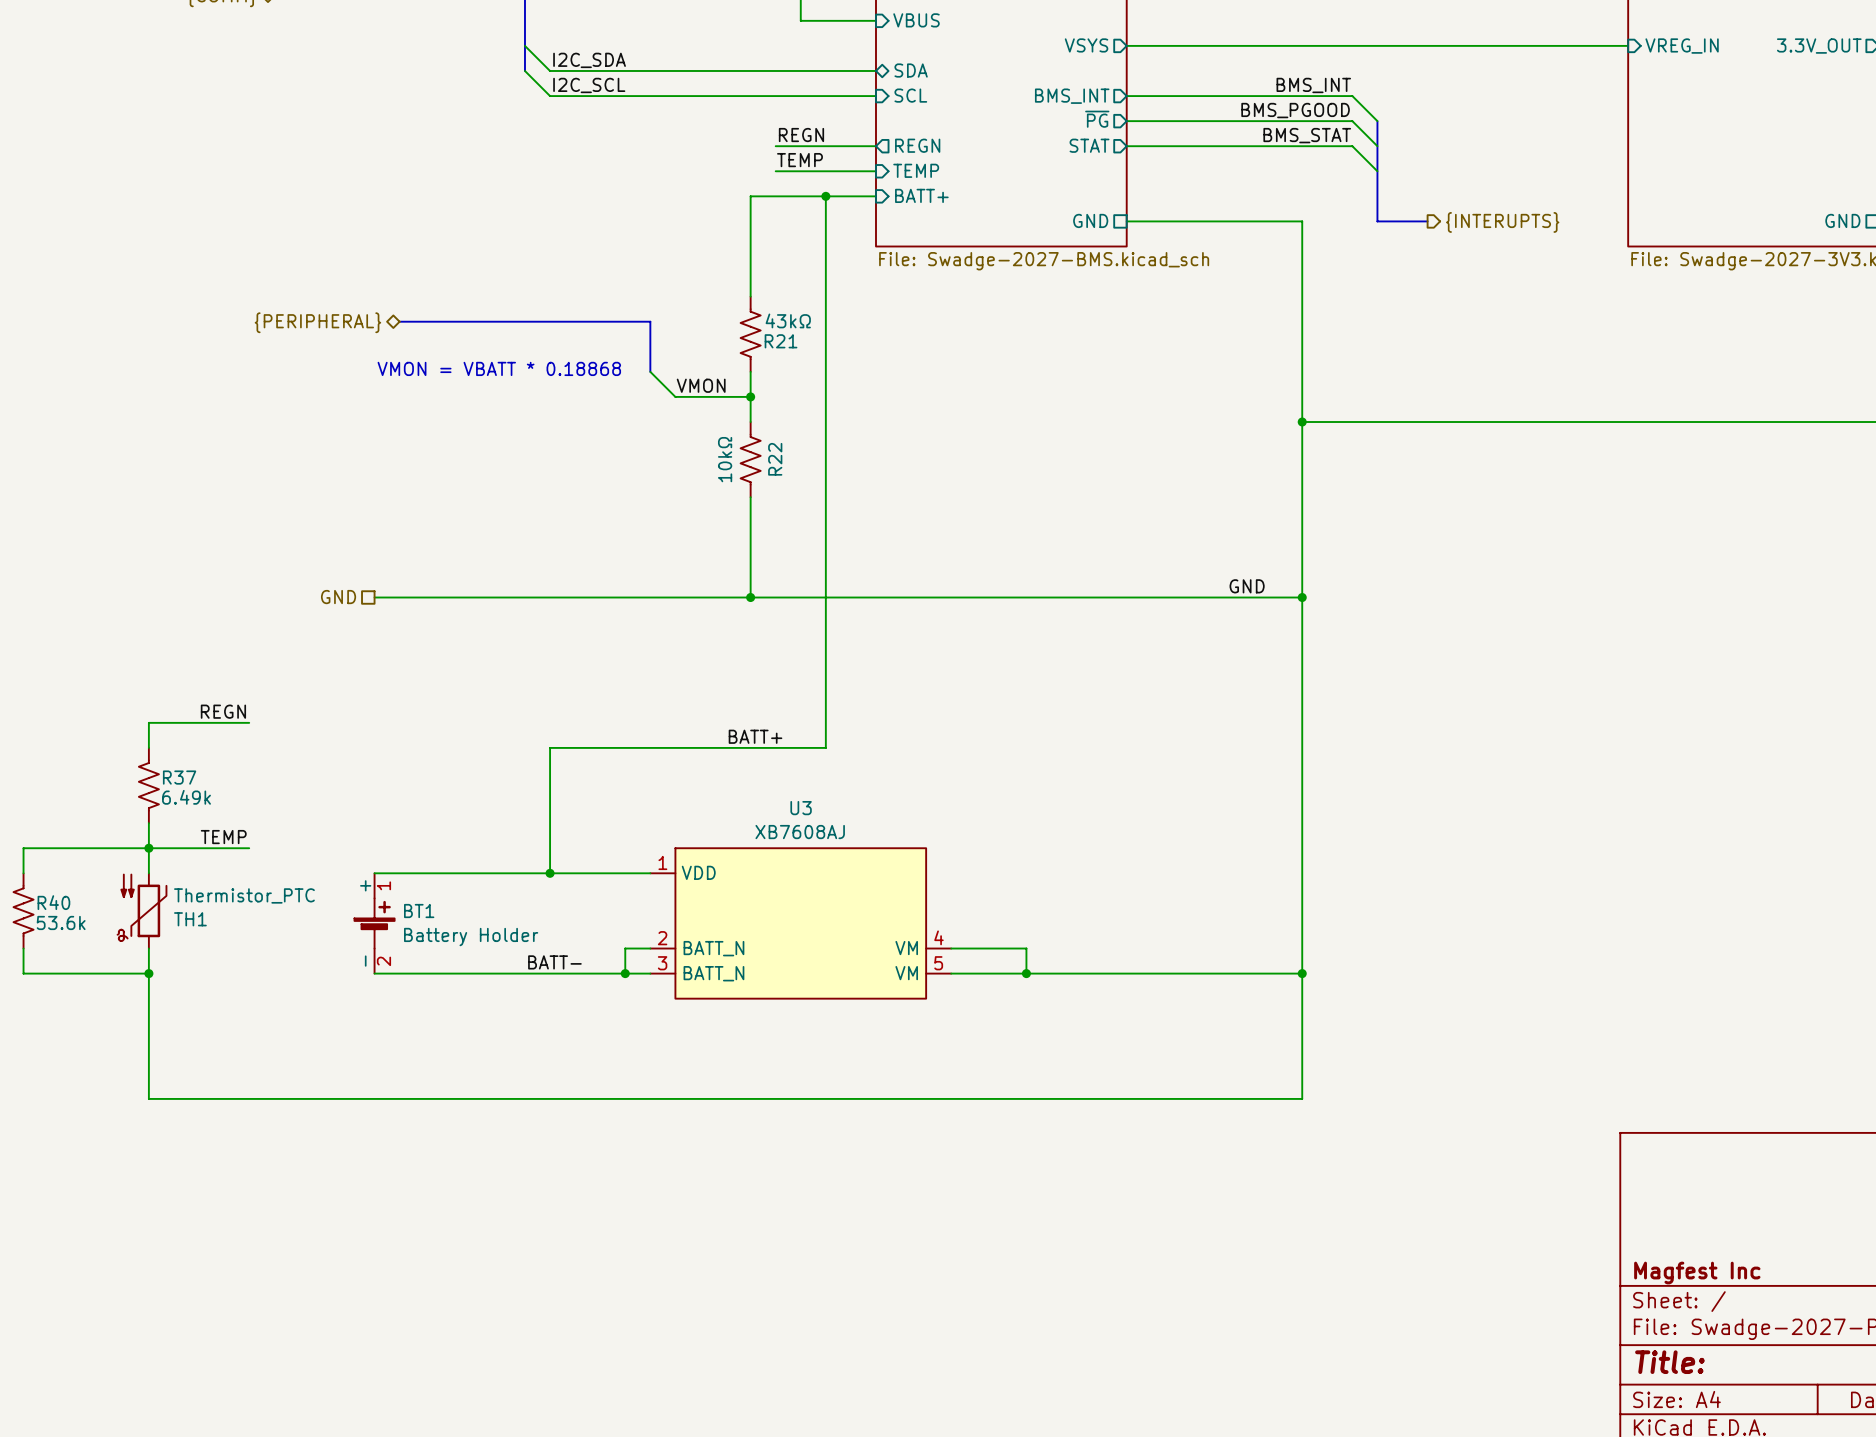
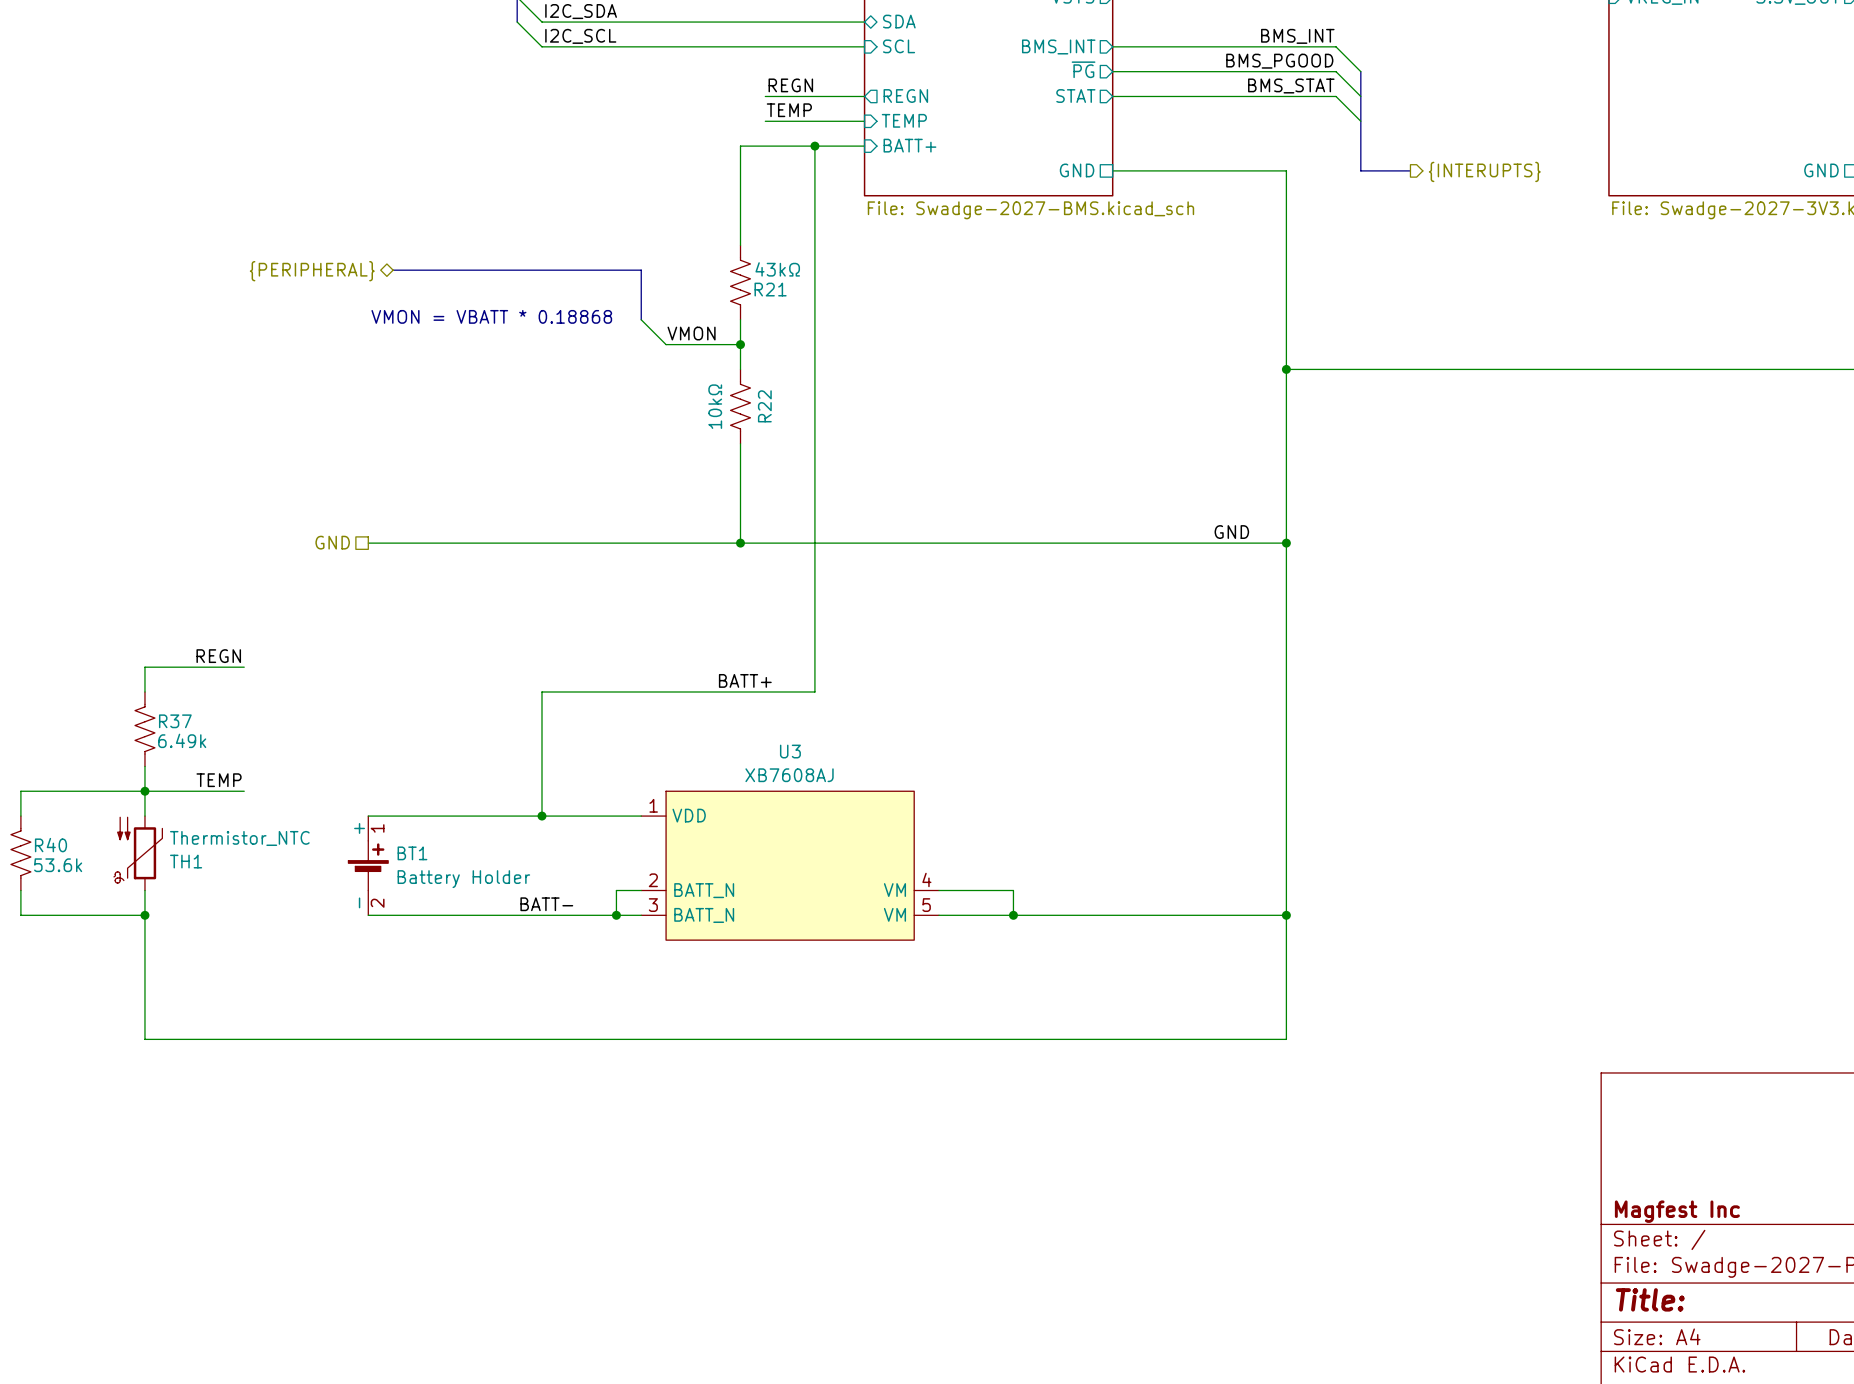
TH1 value: Thermistor_PTC (244, 895) -> Thermistor_NTC (239, 838)

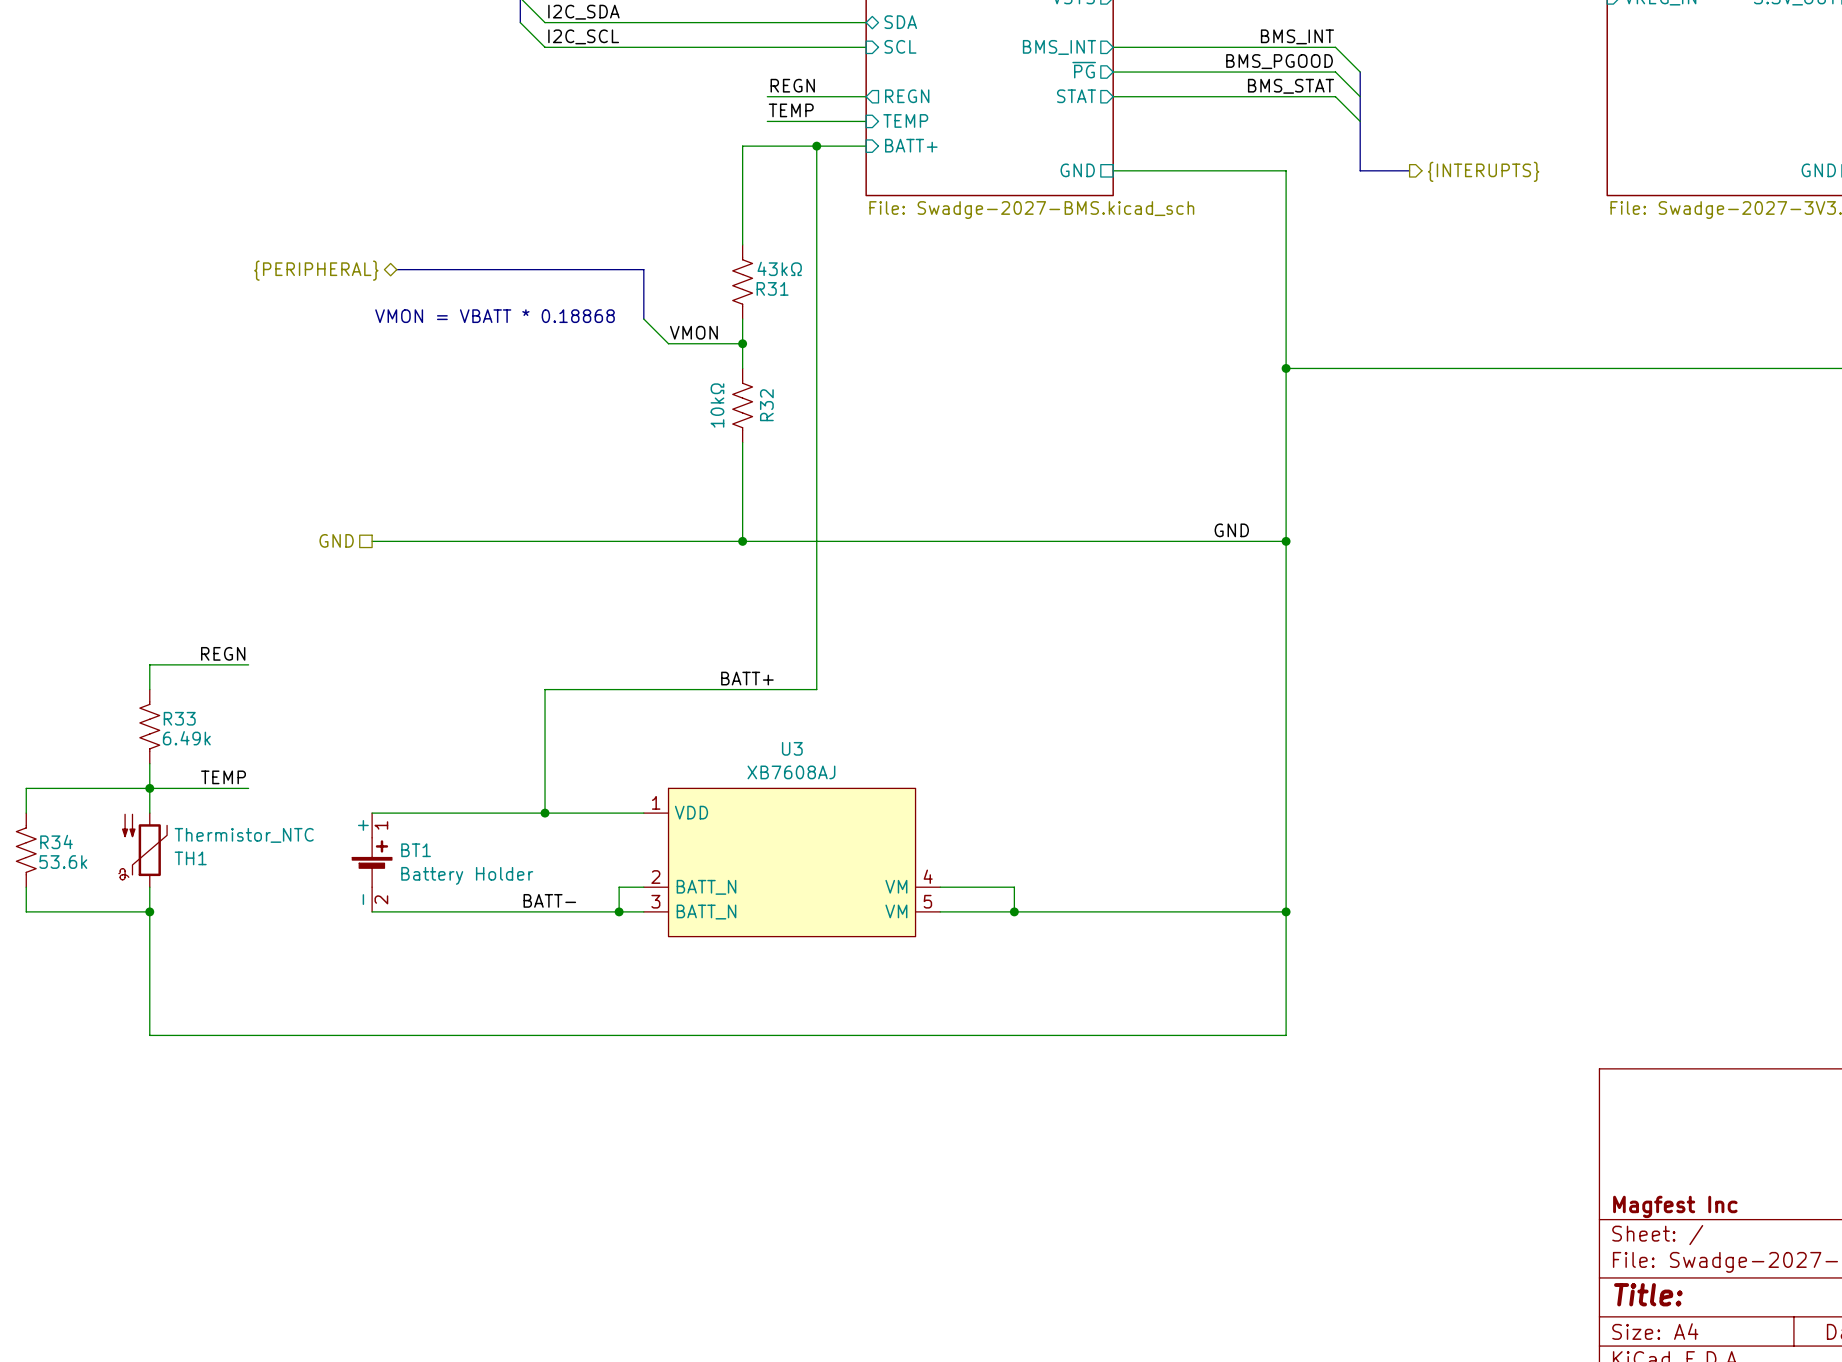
R21 name: R21 (770, 289) -> R31 (772, 288)
R22 name: R22 (764, 406) -> R32 (766, 405)
R37 name: R37 (175, 721) -> R33 (179, 718)
R40 name: R40 (50, 845) -> R34 (56, 841)

